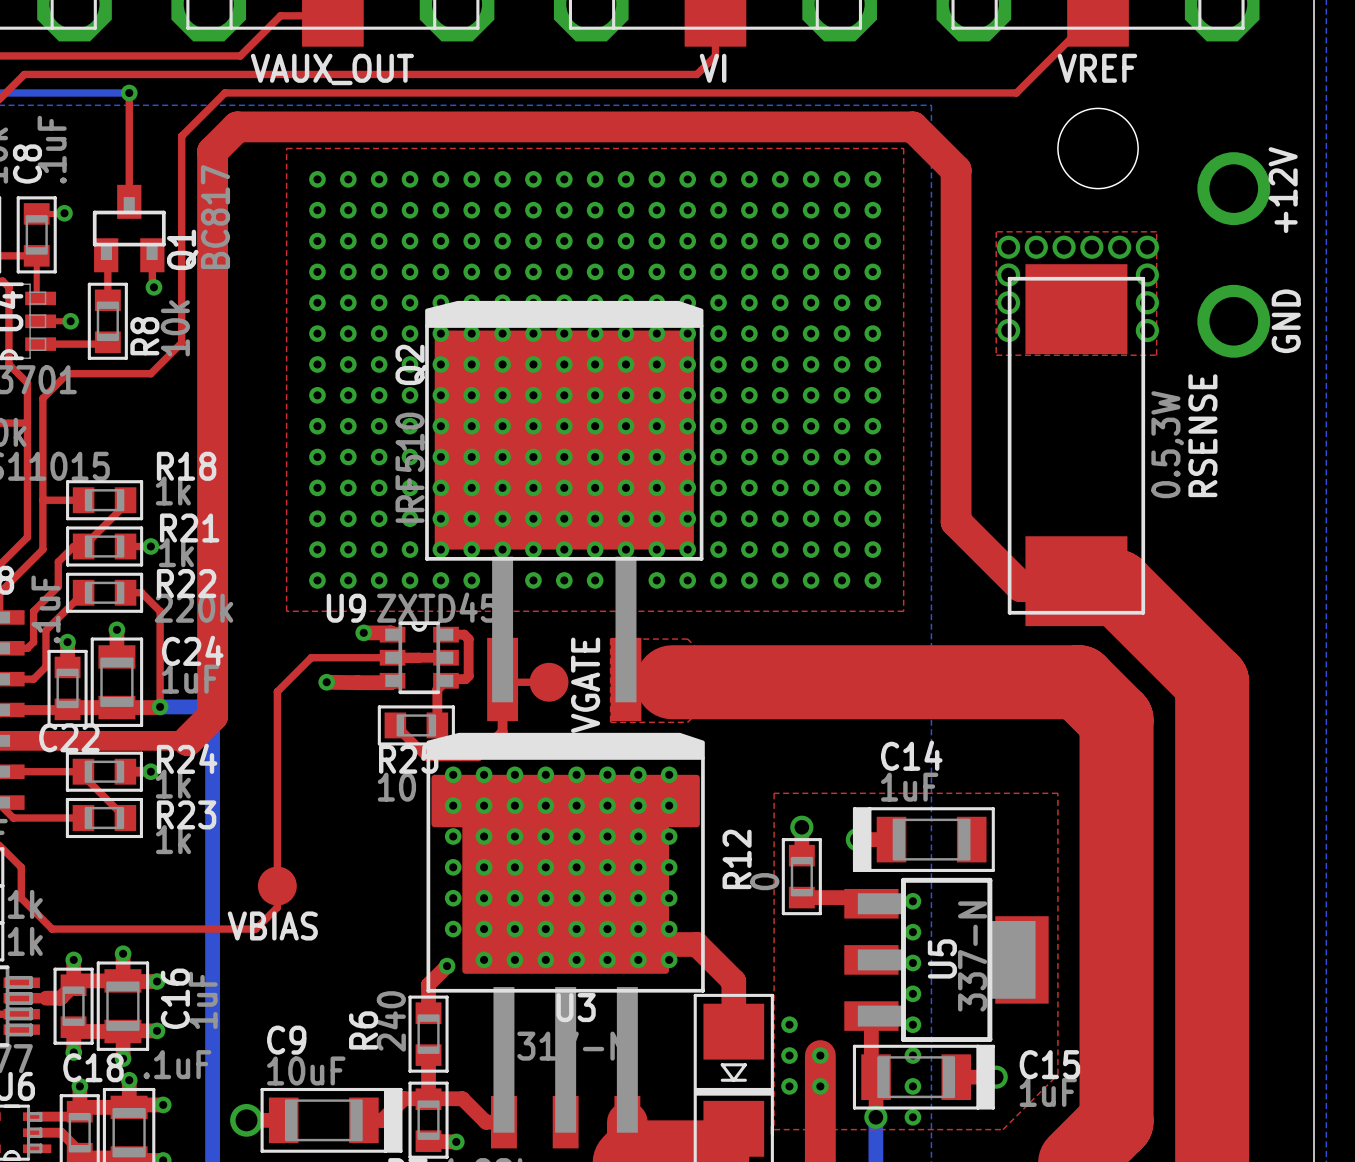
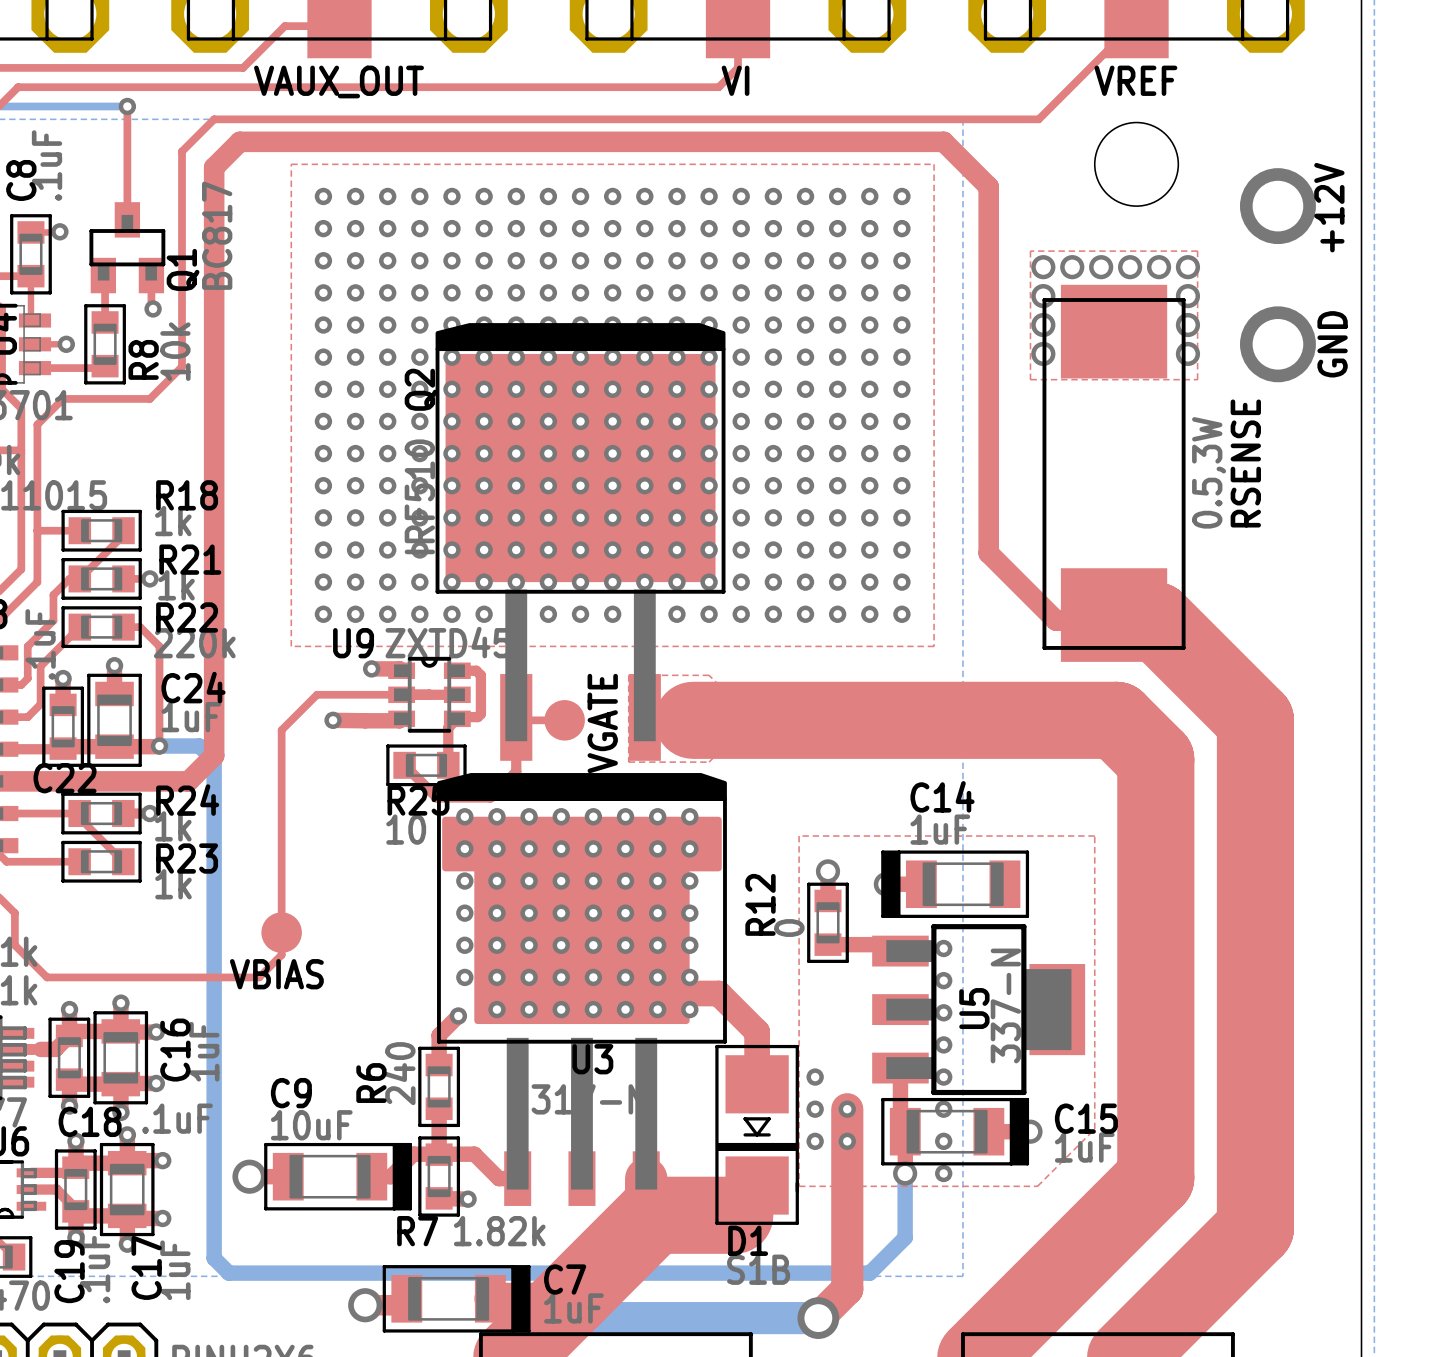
top track: (1016, 92) (224, 92) (212, 105) -> (1051, 106) (1038, 119) (214, 119)
top track width: thick (1116, 586) (1020, 586) (956, 521) (956, 170) (912, 126) (237, 126) (212, 151) (212, 716) (187, 740) -> thin (1155, 620) (1056, 620) (988, 553) (988, 186) (943, 141) (239, 141) (214, 167) (214, 755) (188, 781)

